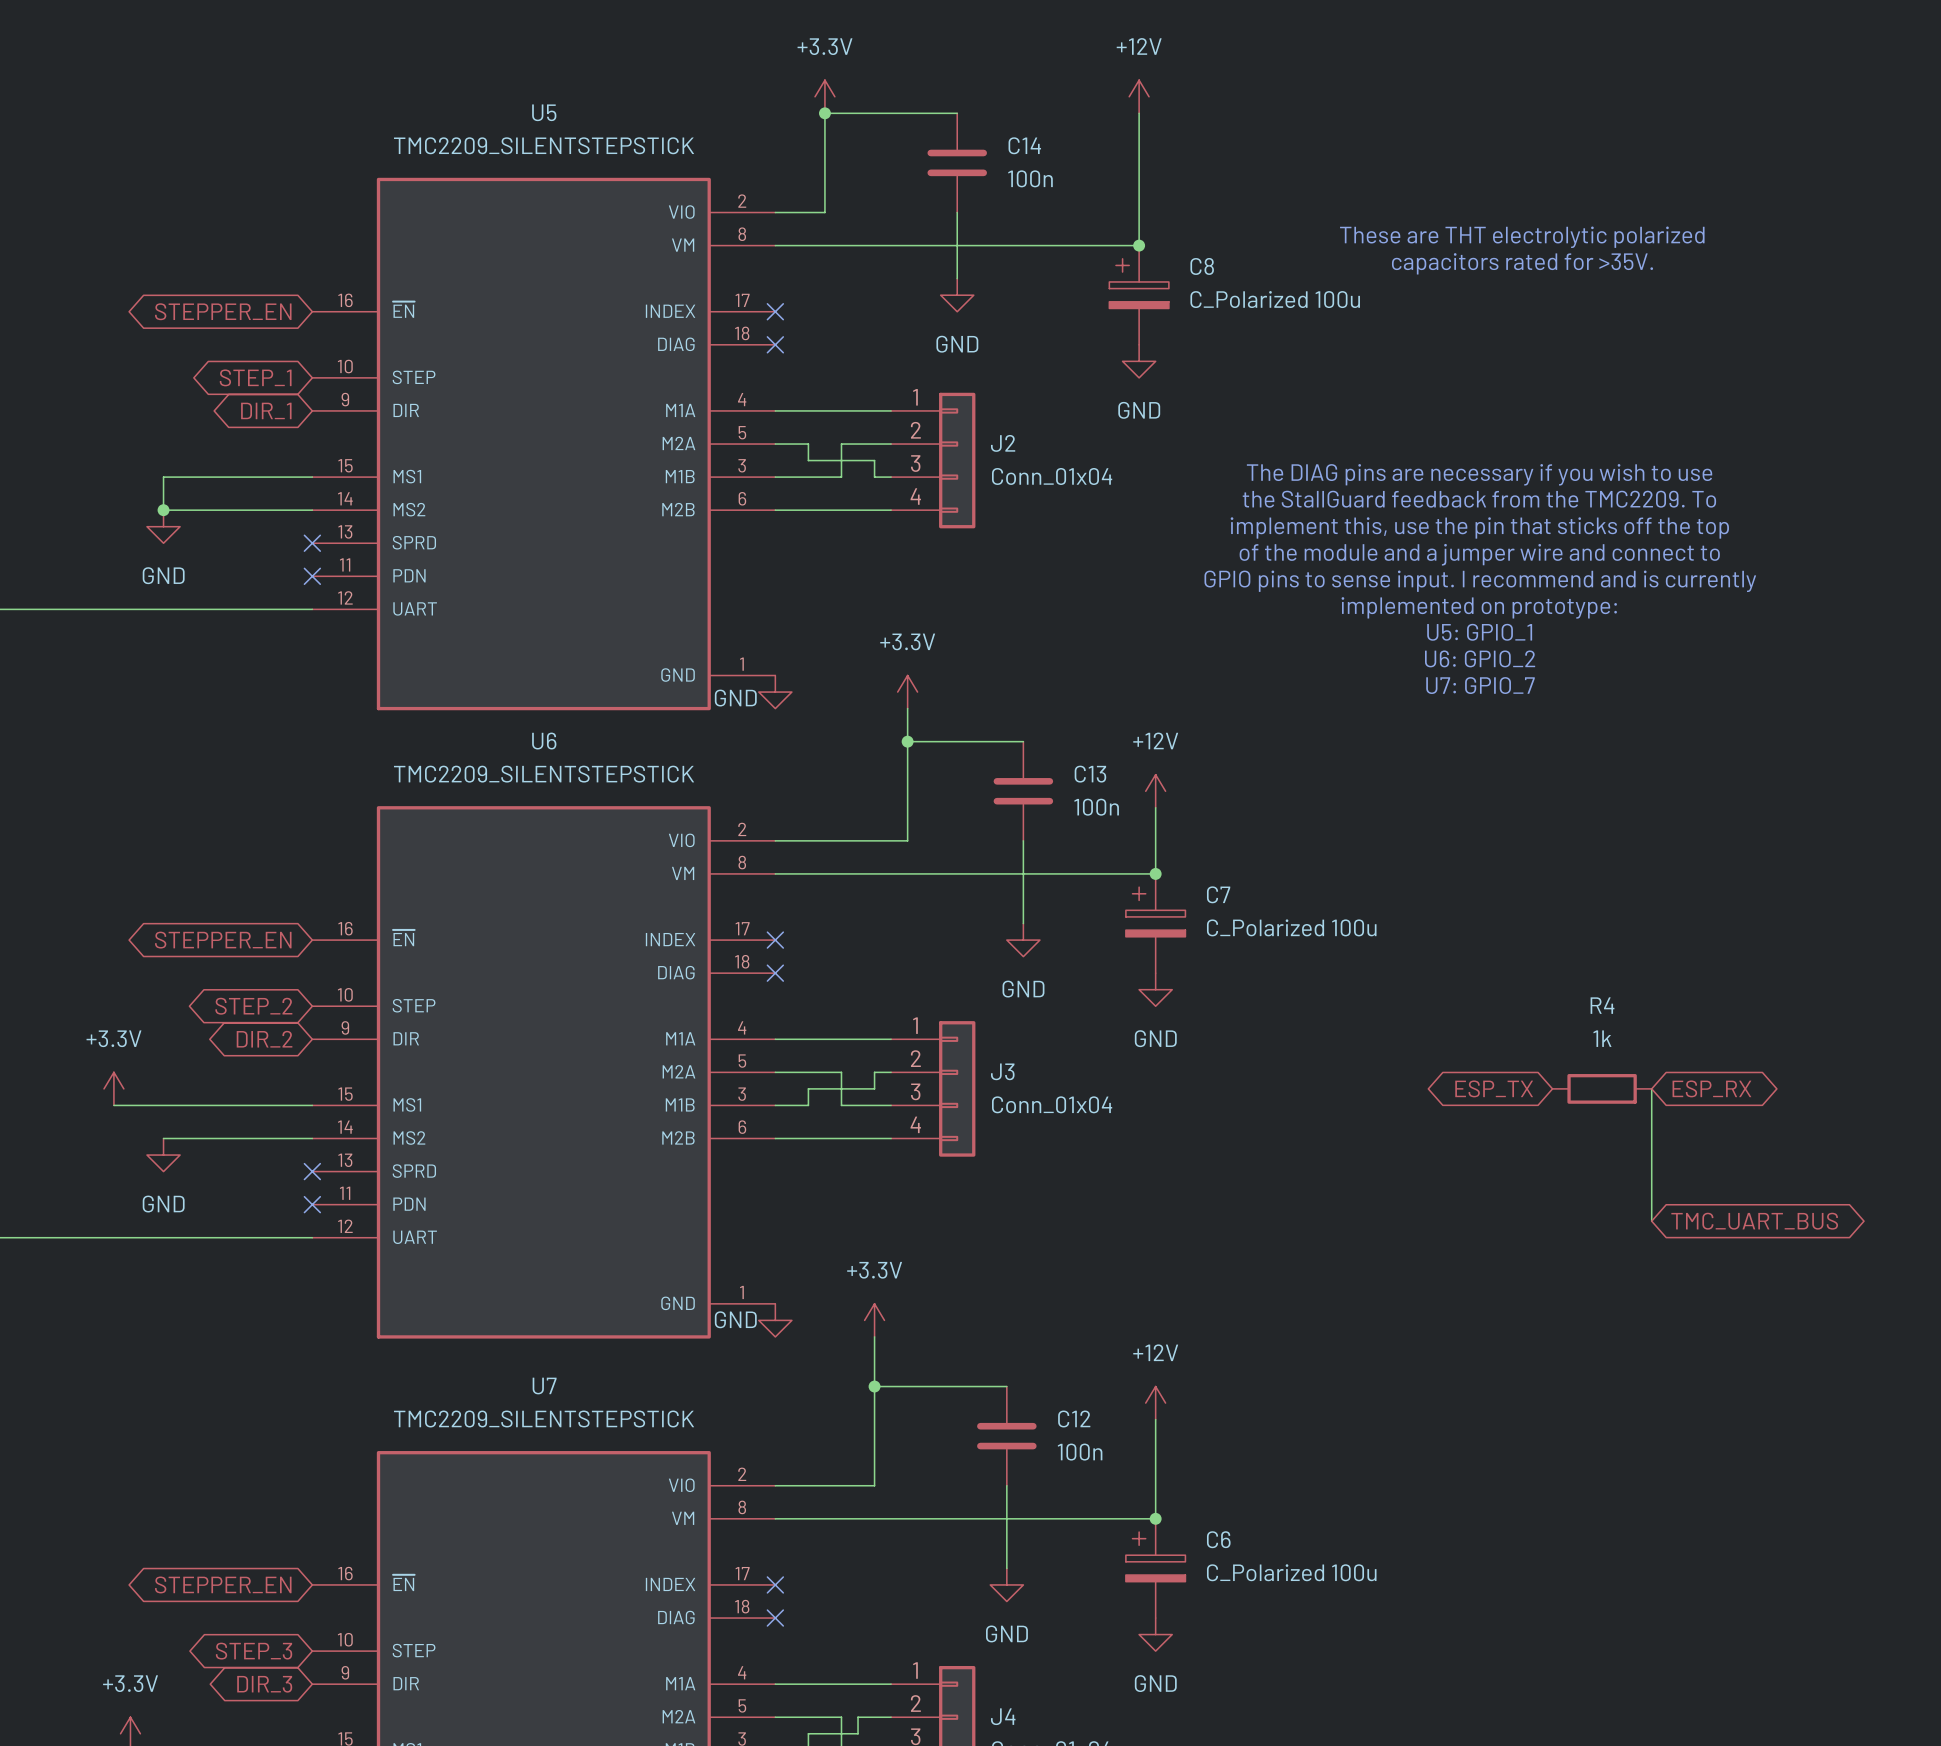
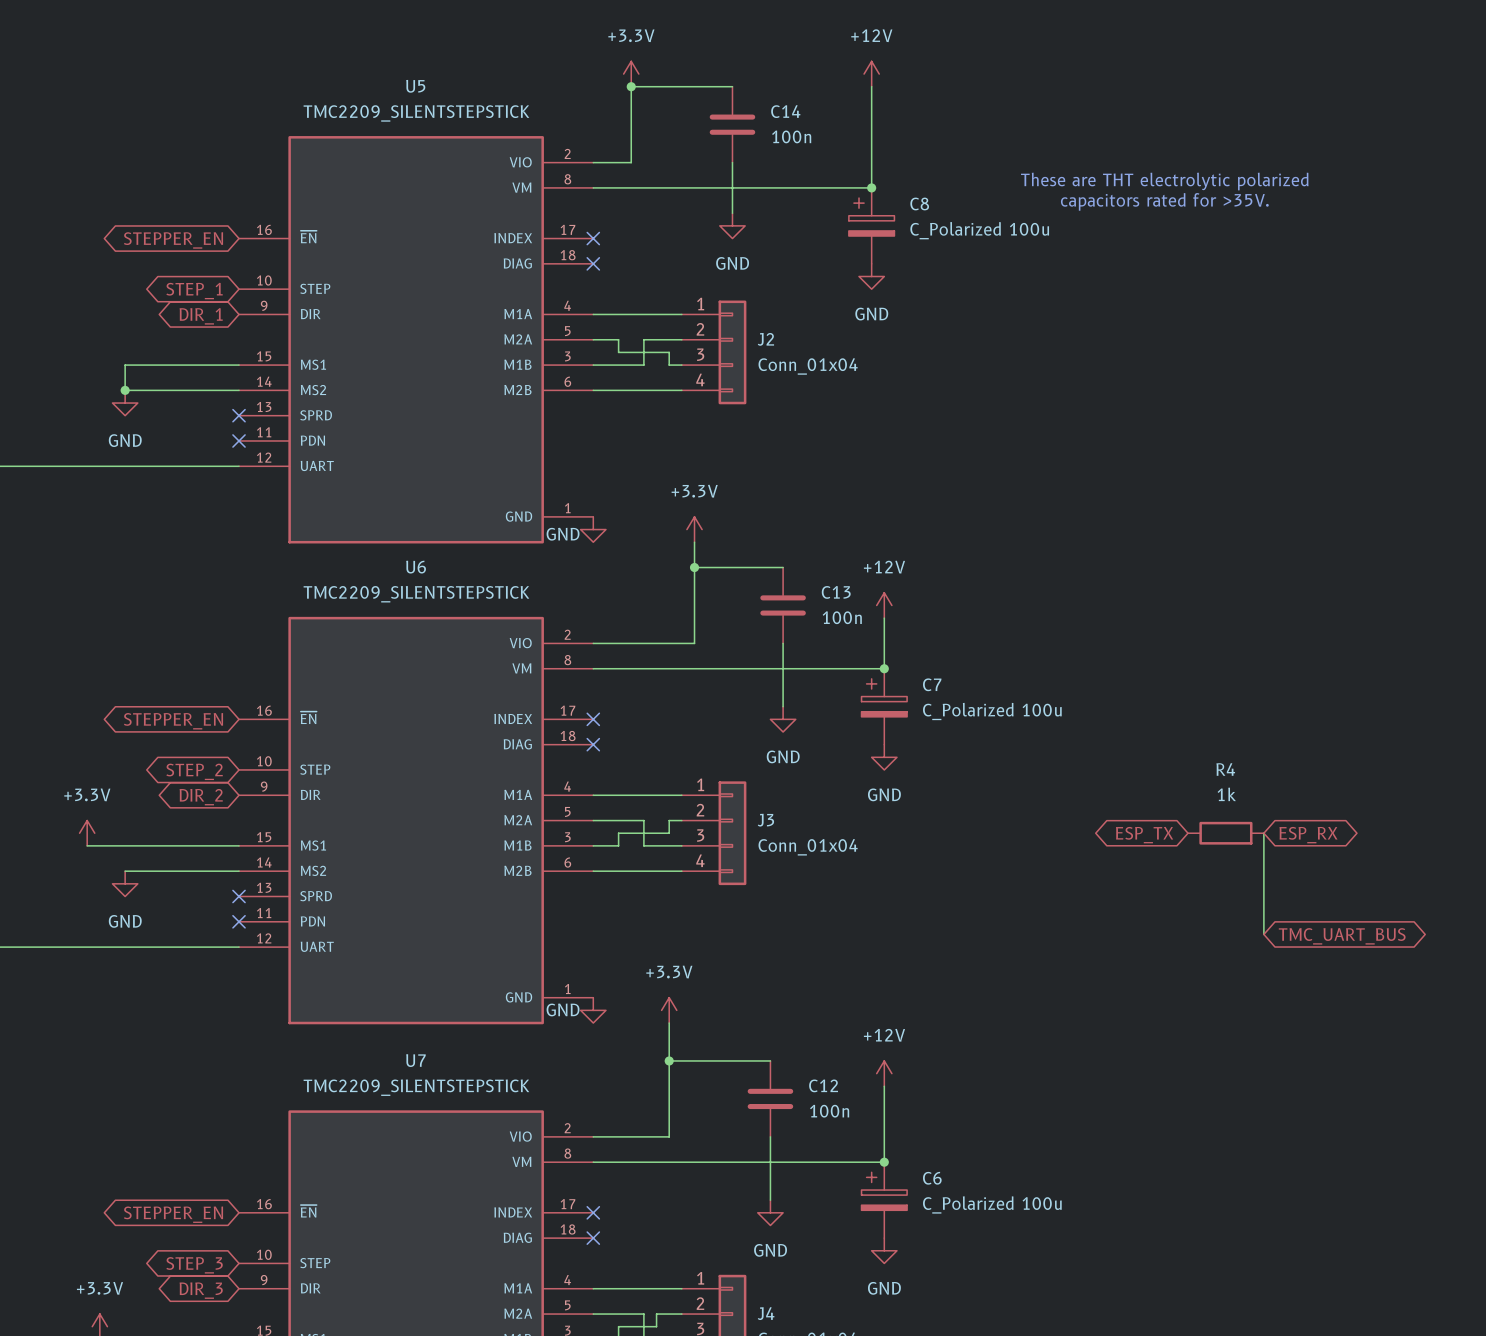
text: The DIAG pins are necessary if you wish to use (1479, 474) -> none
text: the StallGuard feedback from the TMC2209. To (1479, 499) -> none
text: implement this, use the pin that sticks off the top (1479, 527) -> none
text: of the module and a jumper wire and connect to (1479, 554) -> none
text: GPIO pins to sense input. I recommend and is currently (1480, 581) -> none
text: implemented on prototype: (1479, 607) -> none
text: U5: GPIO_1 (1479, 632) -> none
text: U6: GPIO_2 (1480, 658) -> none
text: U7: GPIO_7 (1480, 685) -> none

